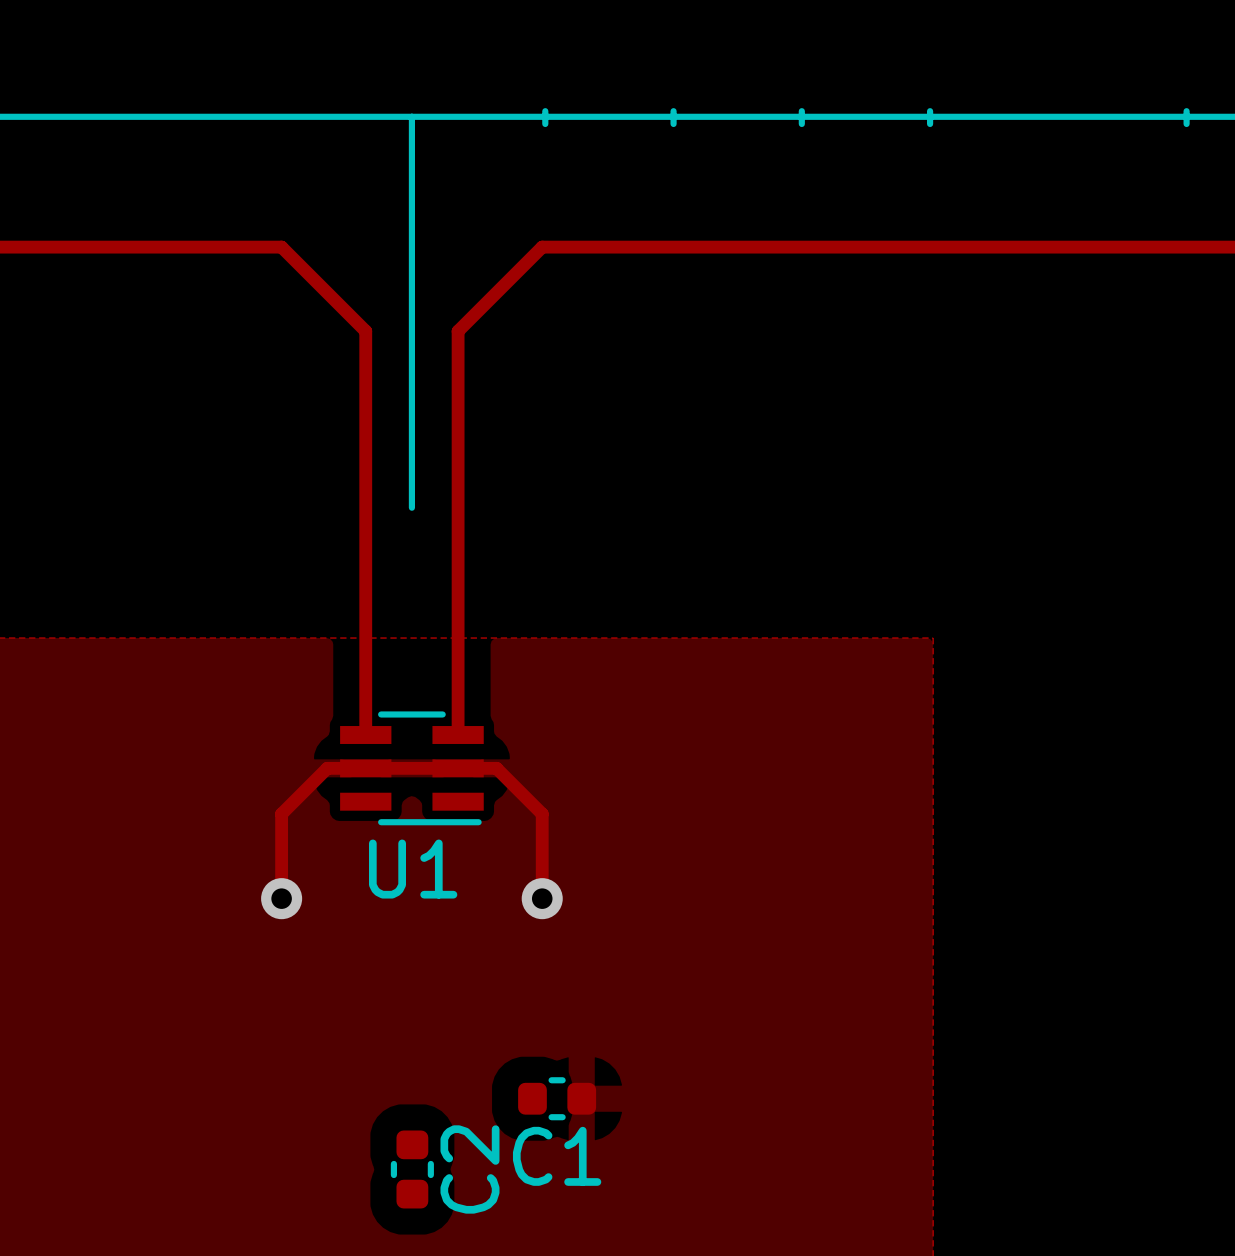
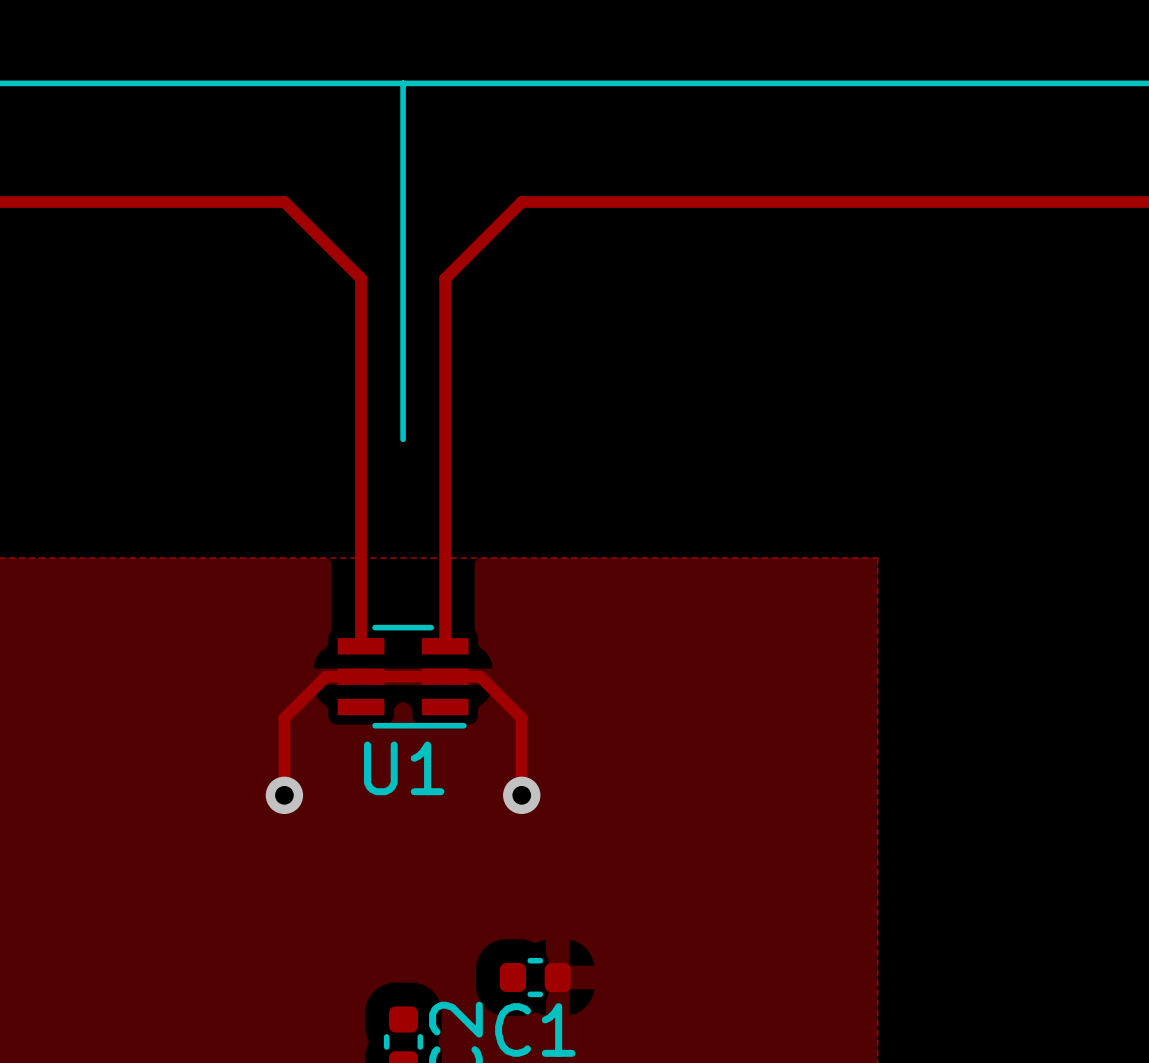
line: (545, 111) (545, 123) -> none
line: (673, 111) (673, 123) -> none
line: (801, 111) (801, 123) -> none
line: (930, 111) (930, 123) -> none
line: (1186, 111) (1186, 123) -> none

